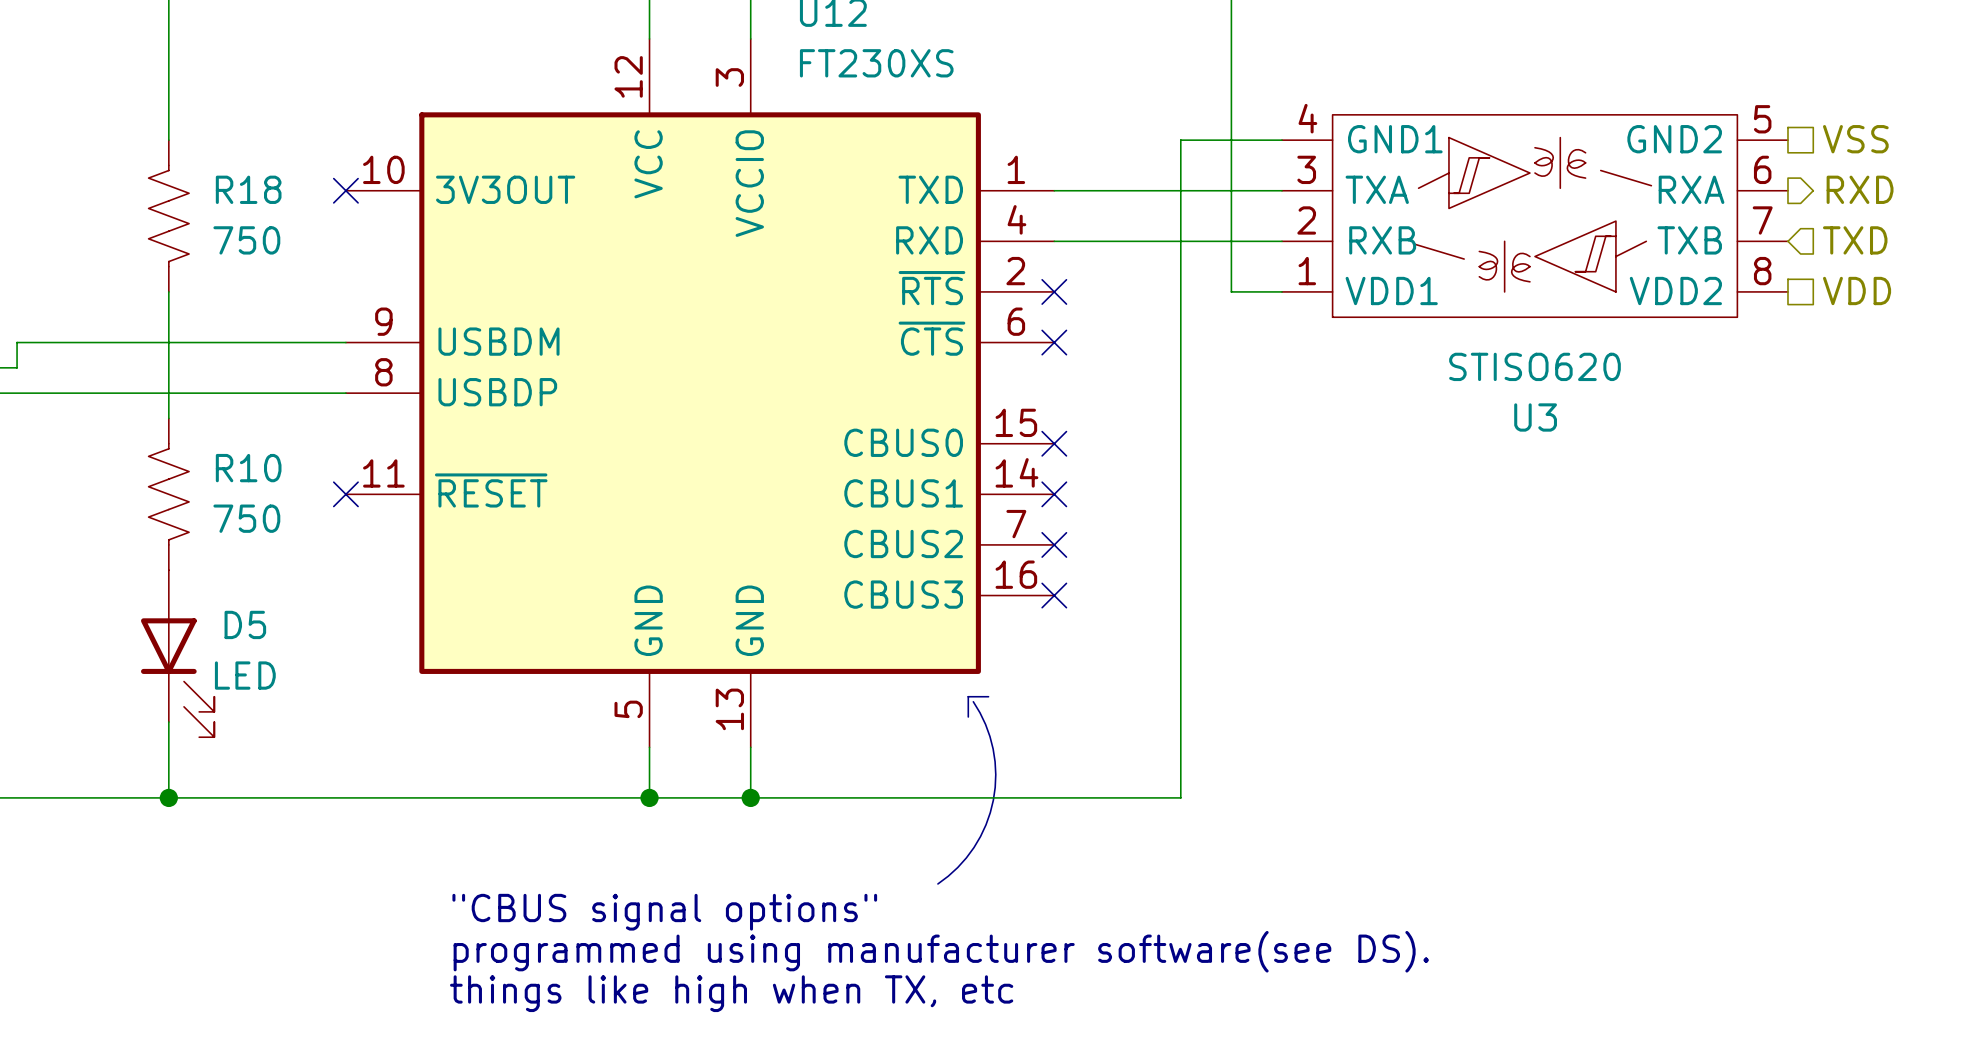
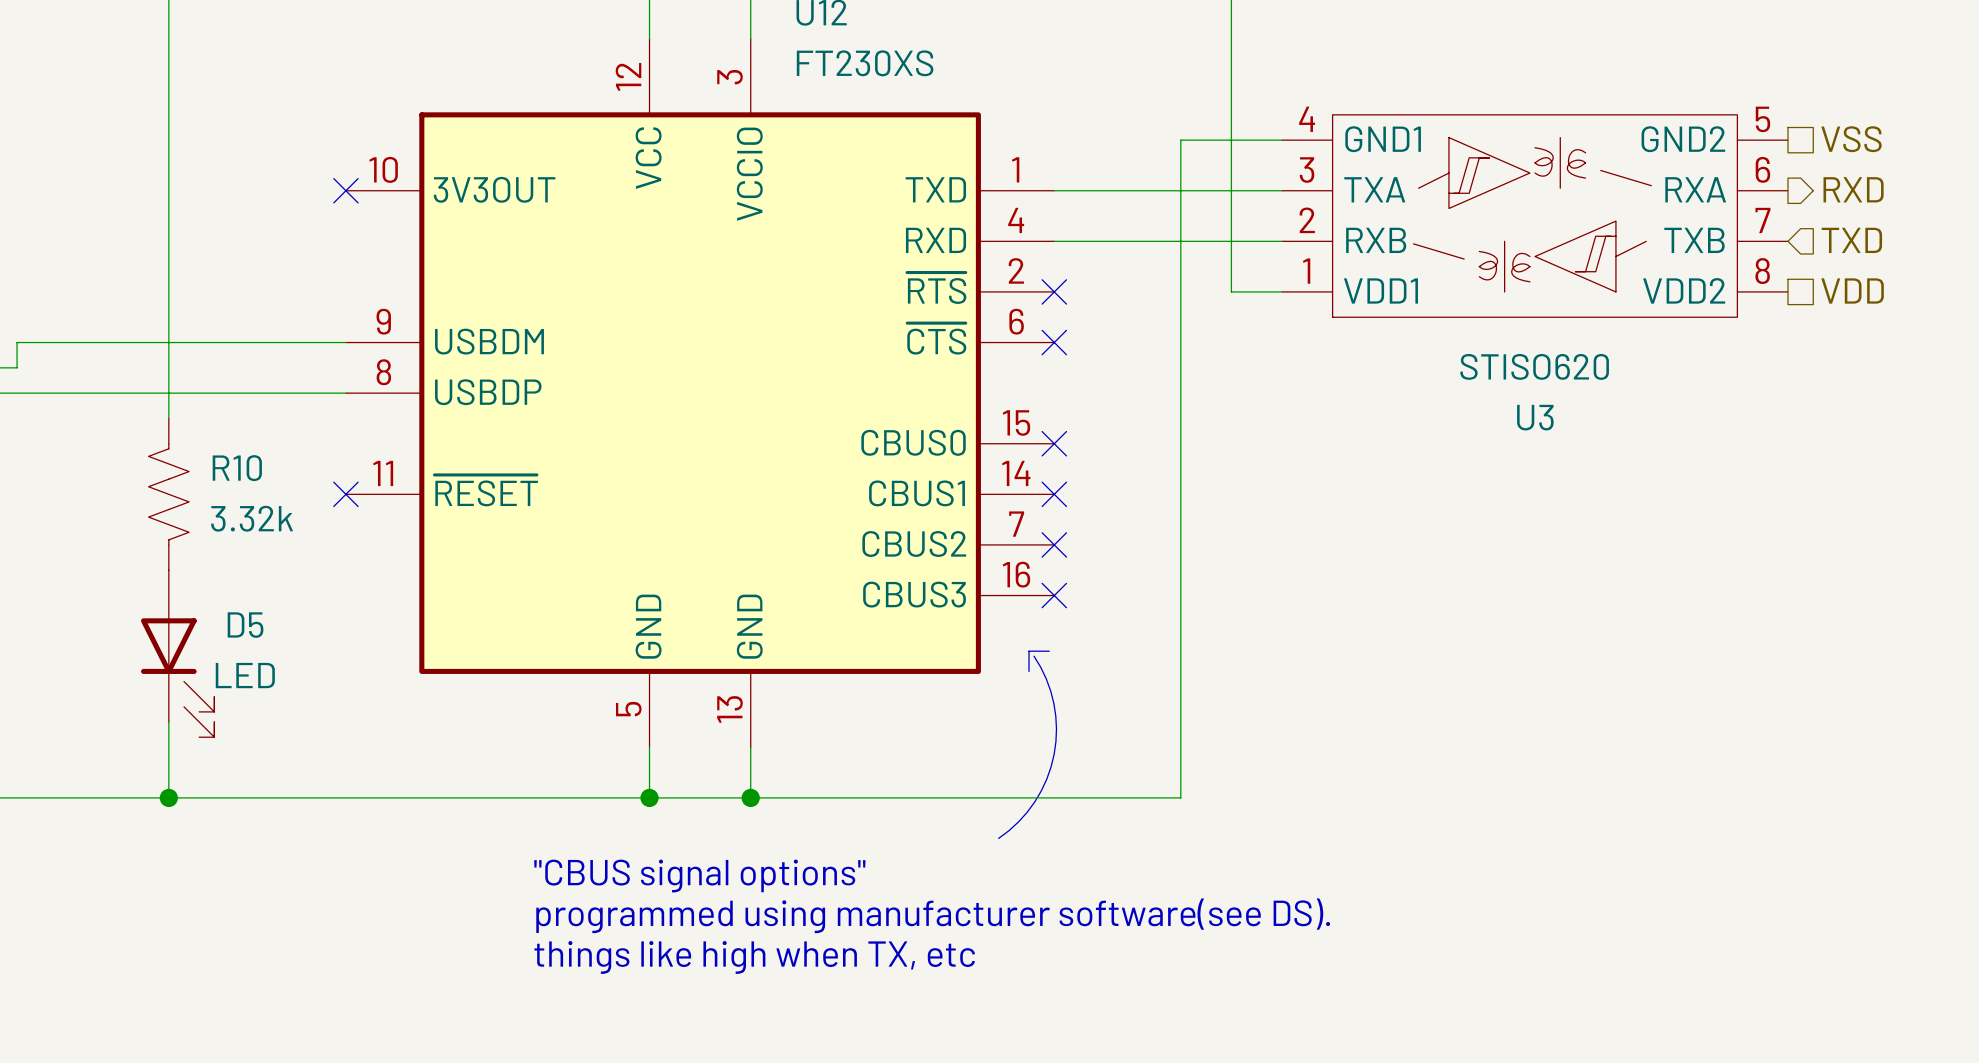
wire: none -> (168, 140) (168, 291)
R18: 750 (168, 216) -> none
R10 value: 750 (246, 518) -> 3.32k (252, 518)
line: (988, 696) (968, 696) (968, 716) -> (1049, 651) (1029, 651) (1029, 671)
line: (973, 701) (985, 724) (993, 749) (995, 774) (993, 800) (986, 824) (973, 847) (957, 867) (937, 883) -> (1034, 656) (1046, 678) (1053, 703) (1056, 729) (1054, 754) (1046, 779) (1034, 802) (1018, 822) (998, 838)
text position: "CBUS signal options" (664, 912) -> "CBUS signal options" (699, 875)
text position: programmed using manufacturer software(see DS). (941, 951) -> programmed using manufacturer software(see DS). (933, 915)
text position: things like high when TX, etc (731, 993) -> things like high when TX, etc (754, 957)

